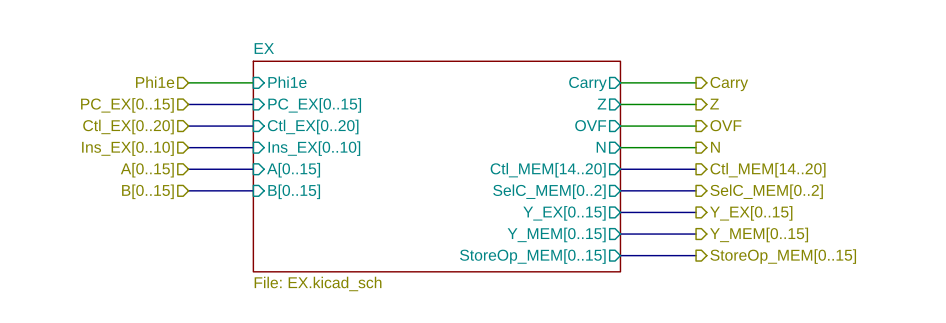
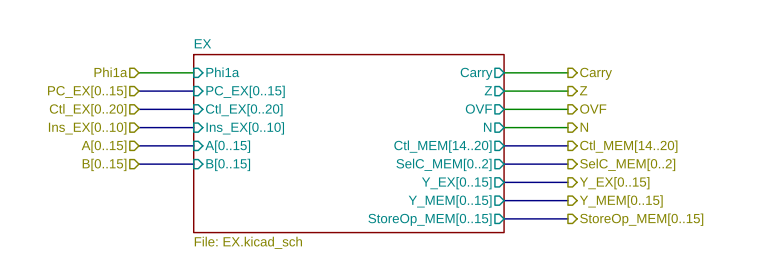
hierarchical label: Phi1e (155, 82) -> Phi1a (110, 72)
sheet pin: Phi1e (287, 82) -> Phi1a (222, 72)

